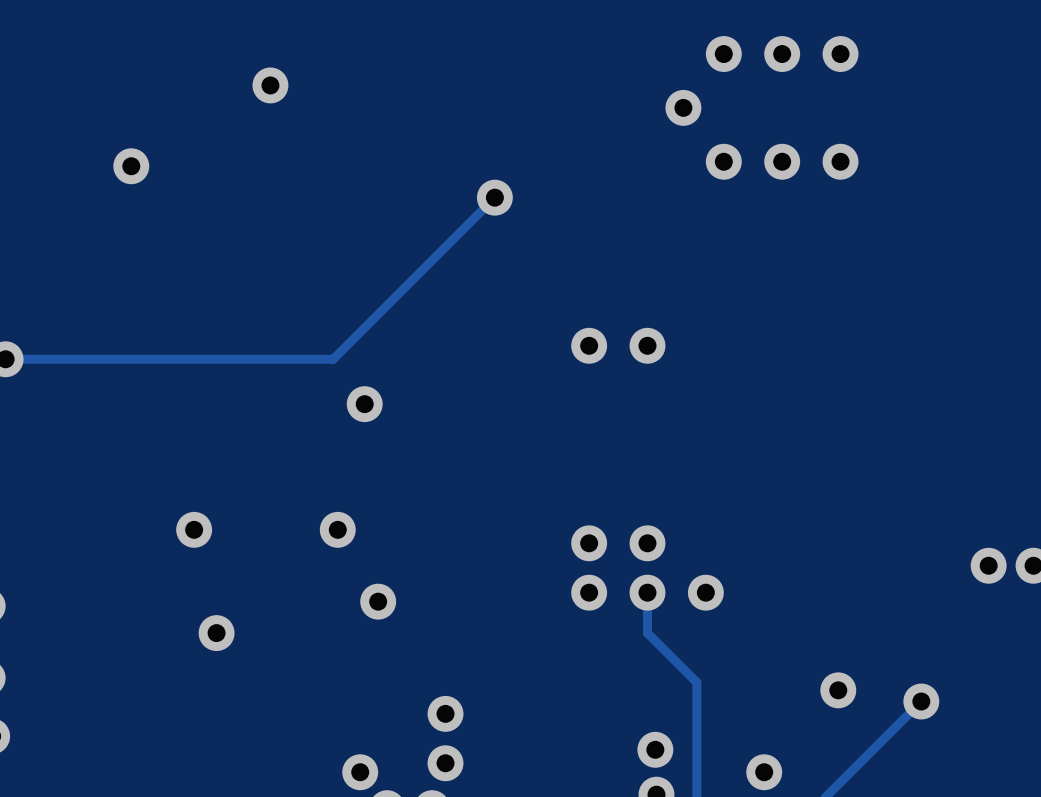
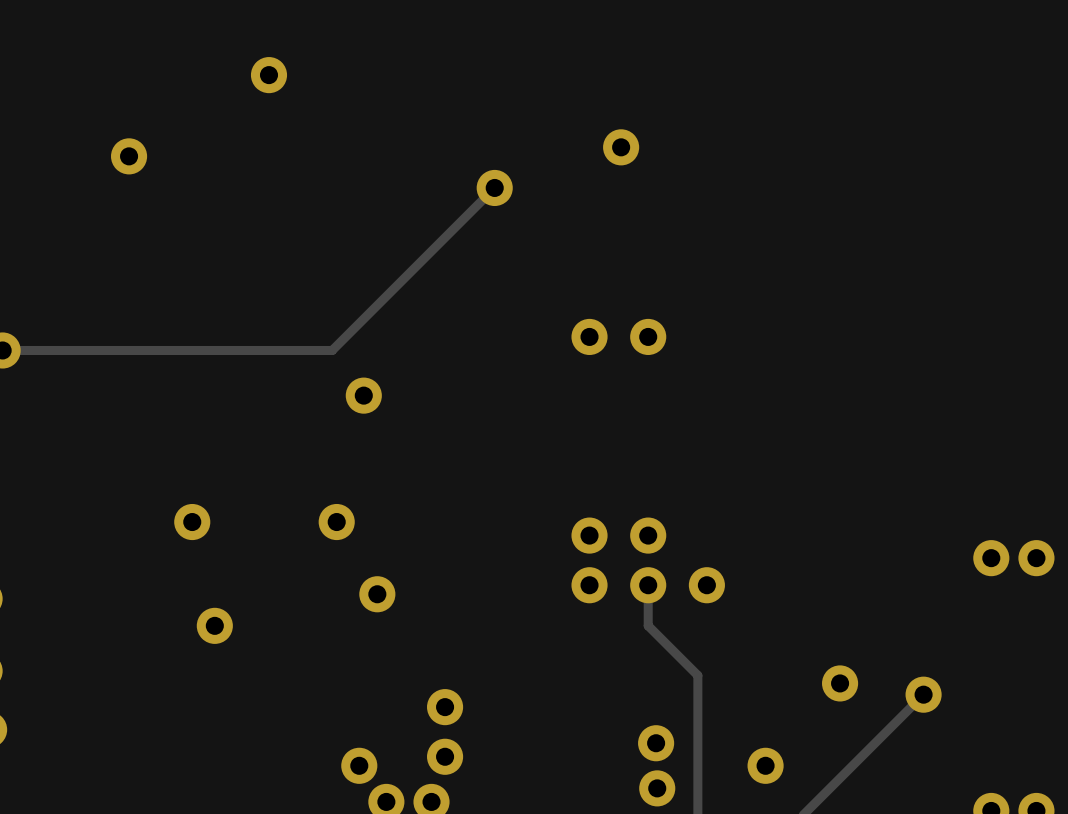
via: (723, 54) -> none
via: (782, 54) -> none
via: (840, 54) -> none
via: (683, 107) -> none
via: none -> (621, 147)
via: (723, 161) -> none
via: (782, 161) -> none
via: (840, 161) -> none

